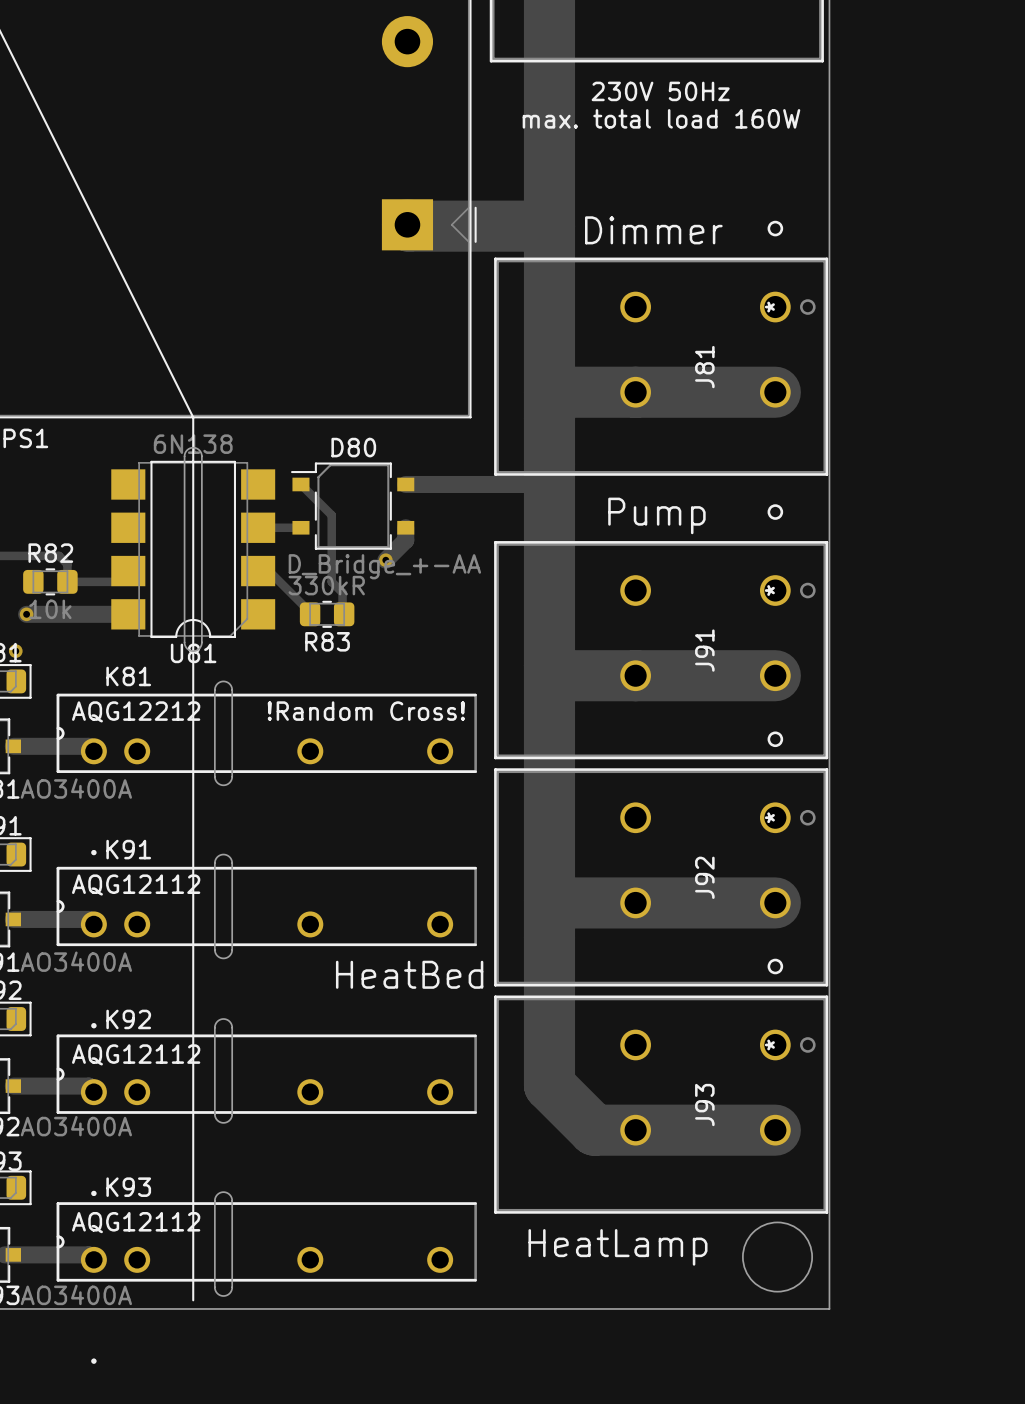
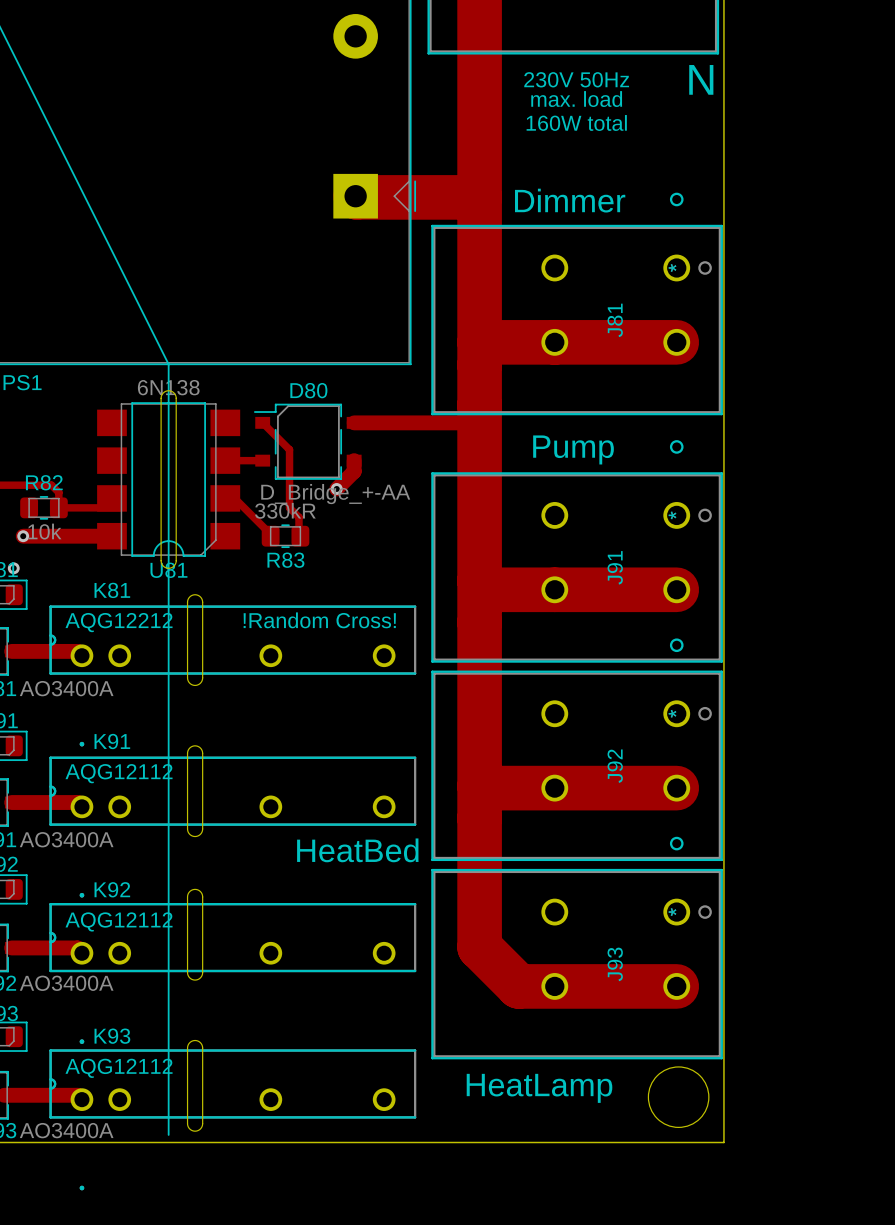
text: none -> N (701, 79)
text: max. total load 160W (661, 118) -> max. load (576, 99)
text: none -> 160W total (576, 122)

